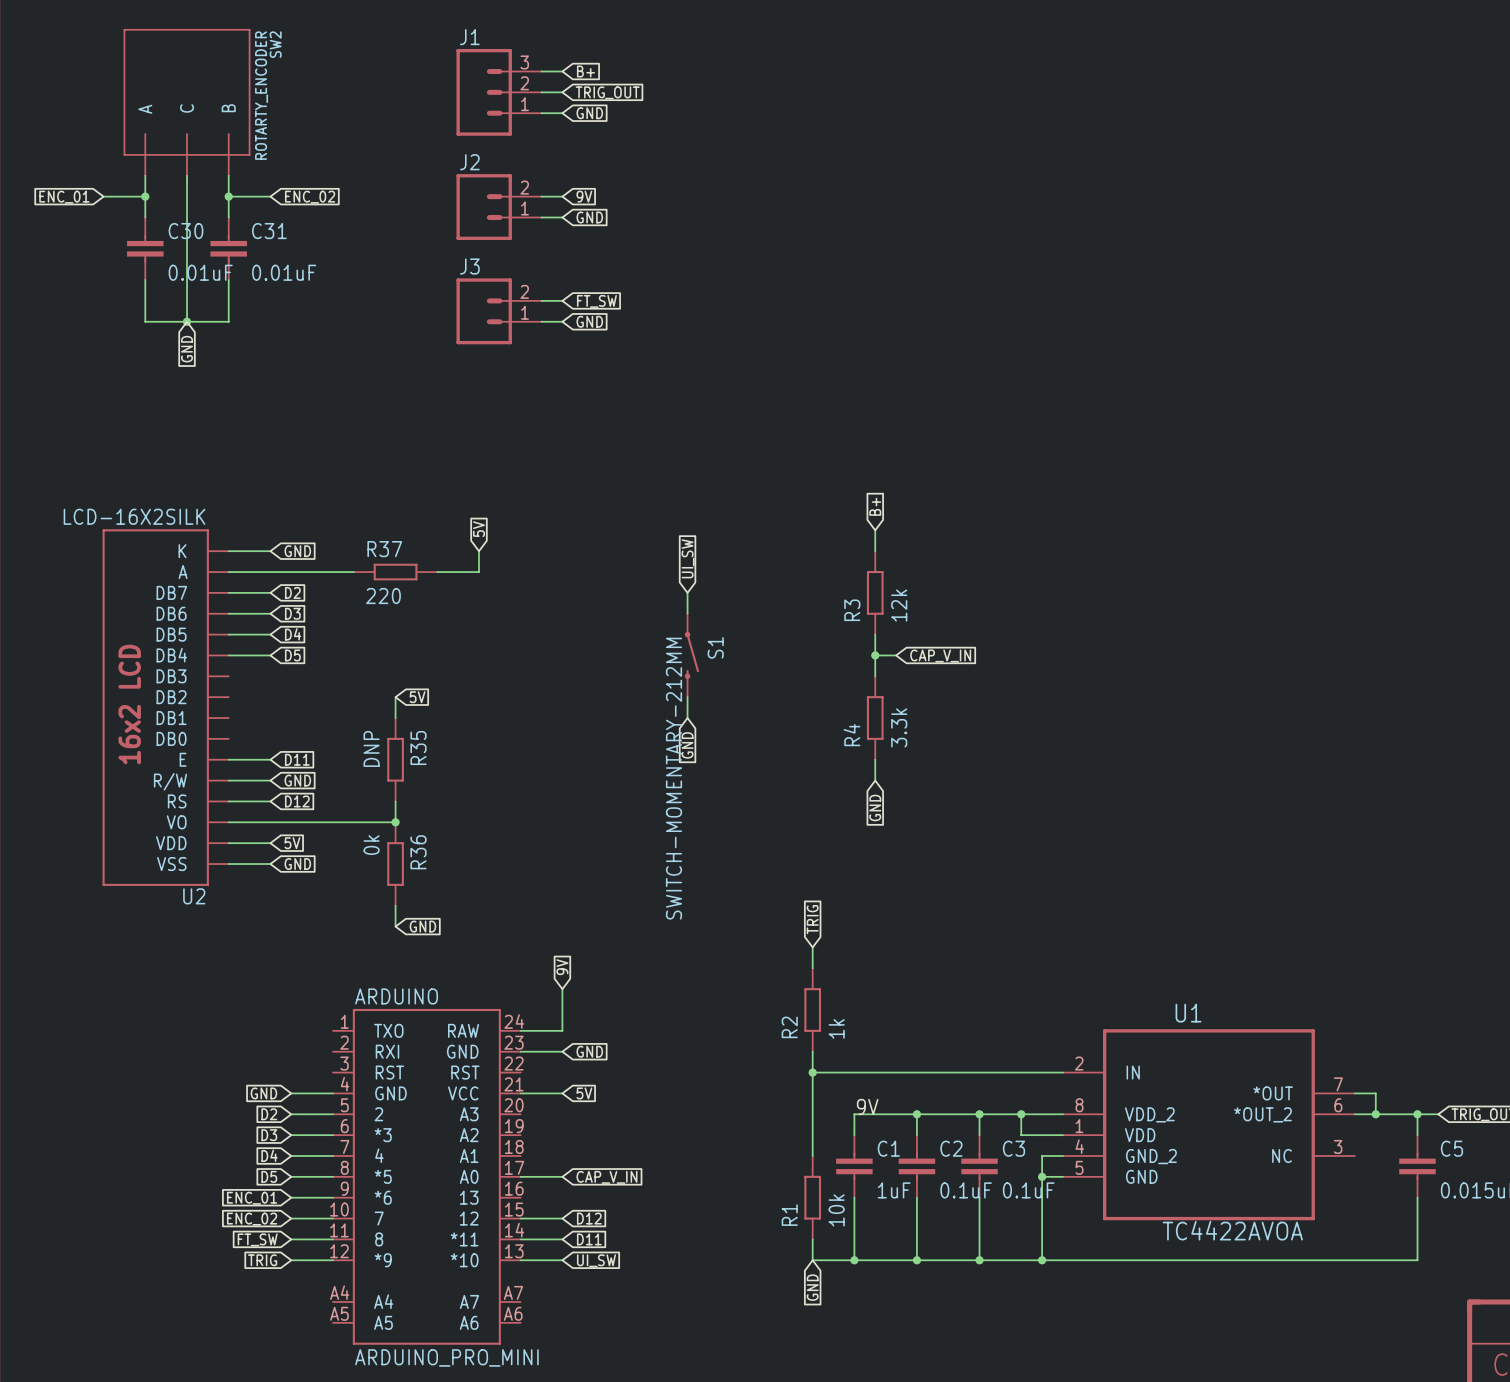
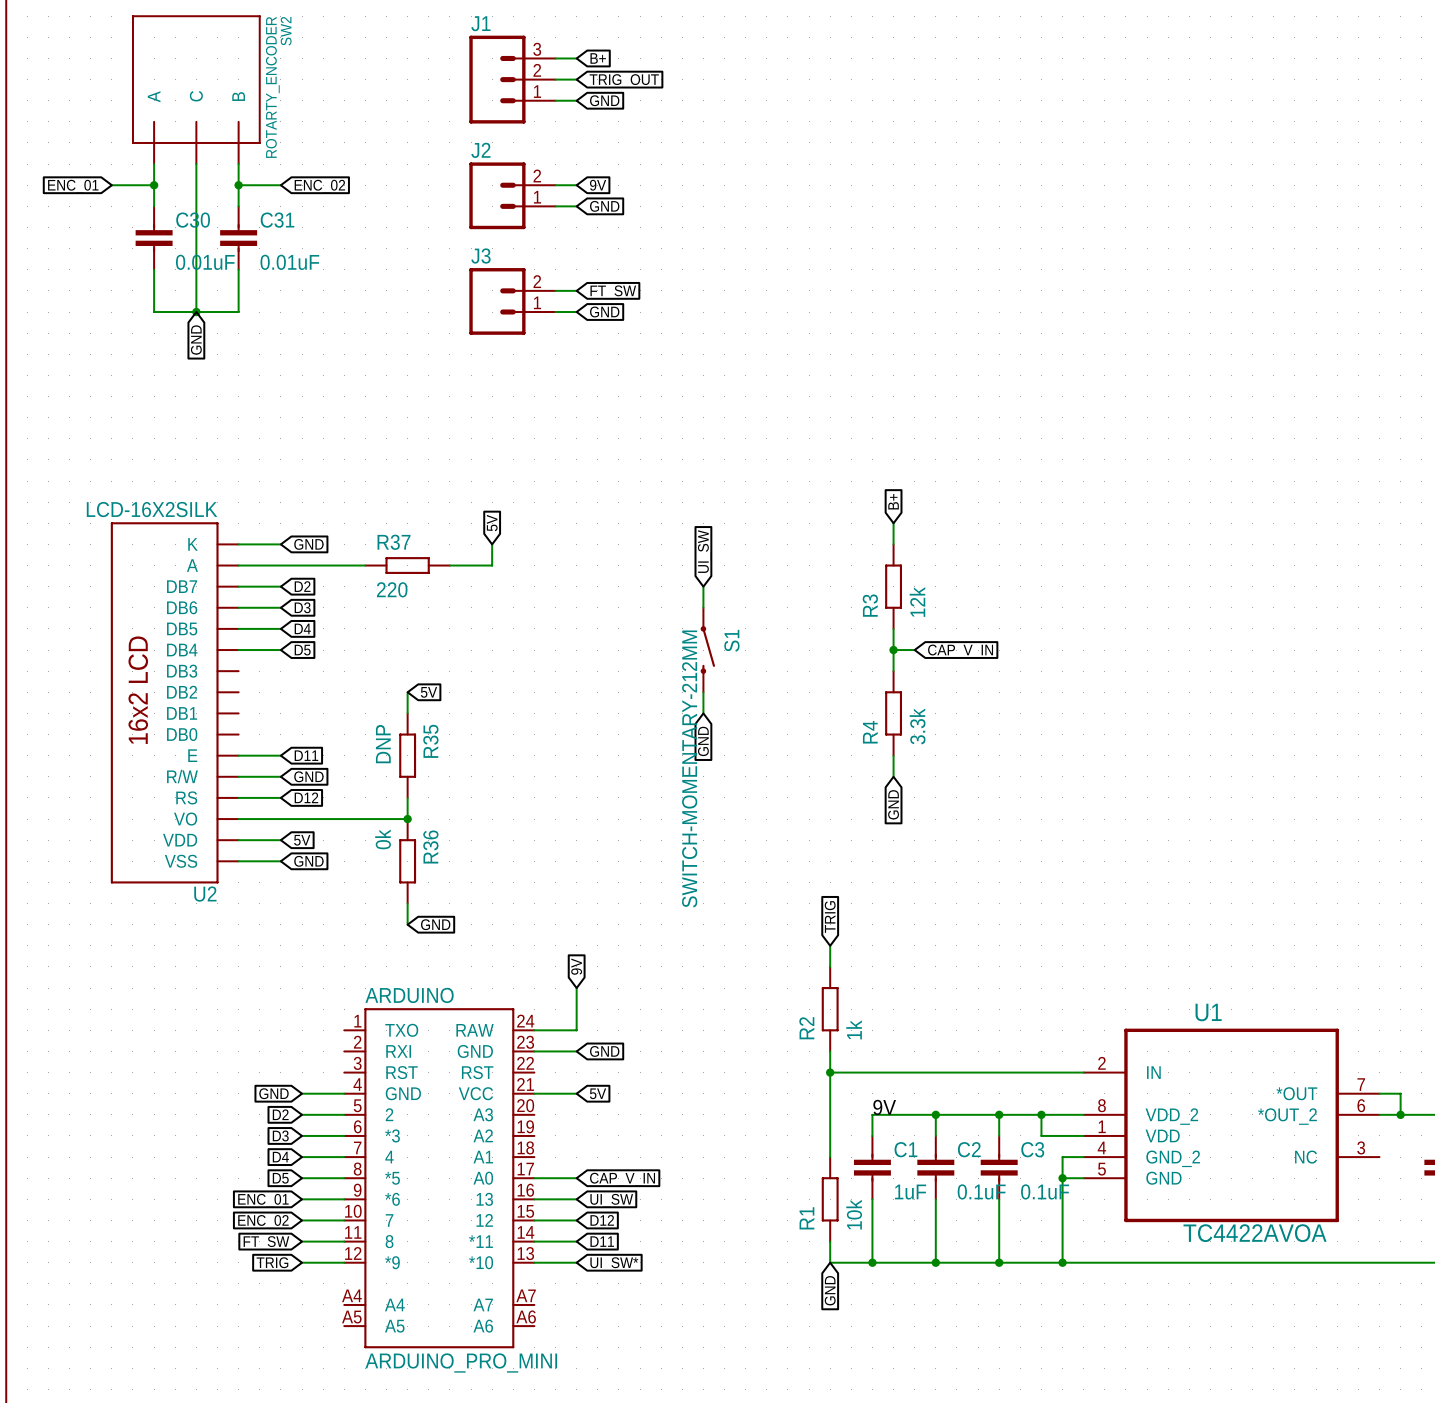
wire: none -> (534, 1199) (576, 1199)
global label: none -> UI_SW (611, 1200)
global label: UI_SW (596, 1260) -> UI_SW* (614, 1264)

